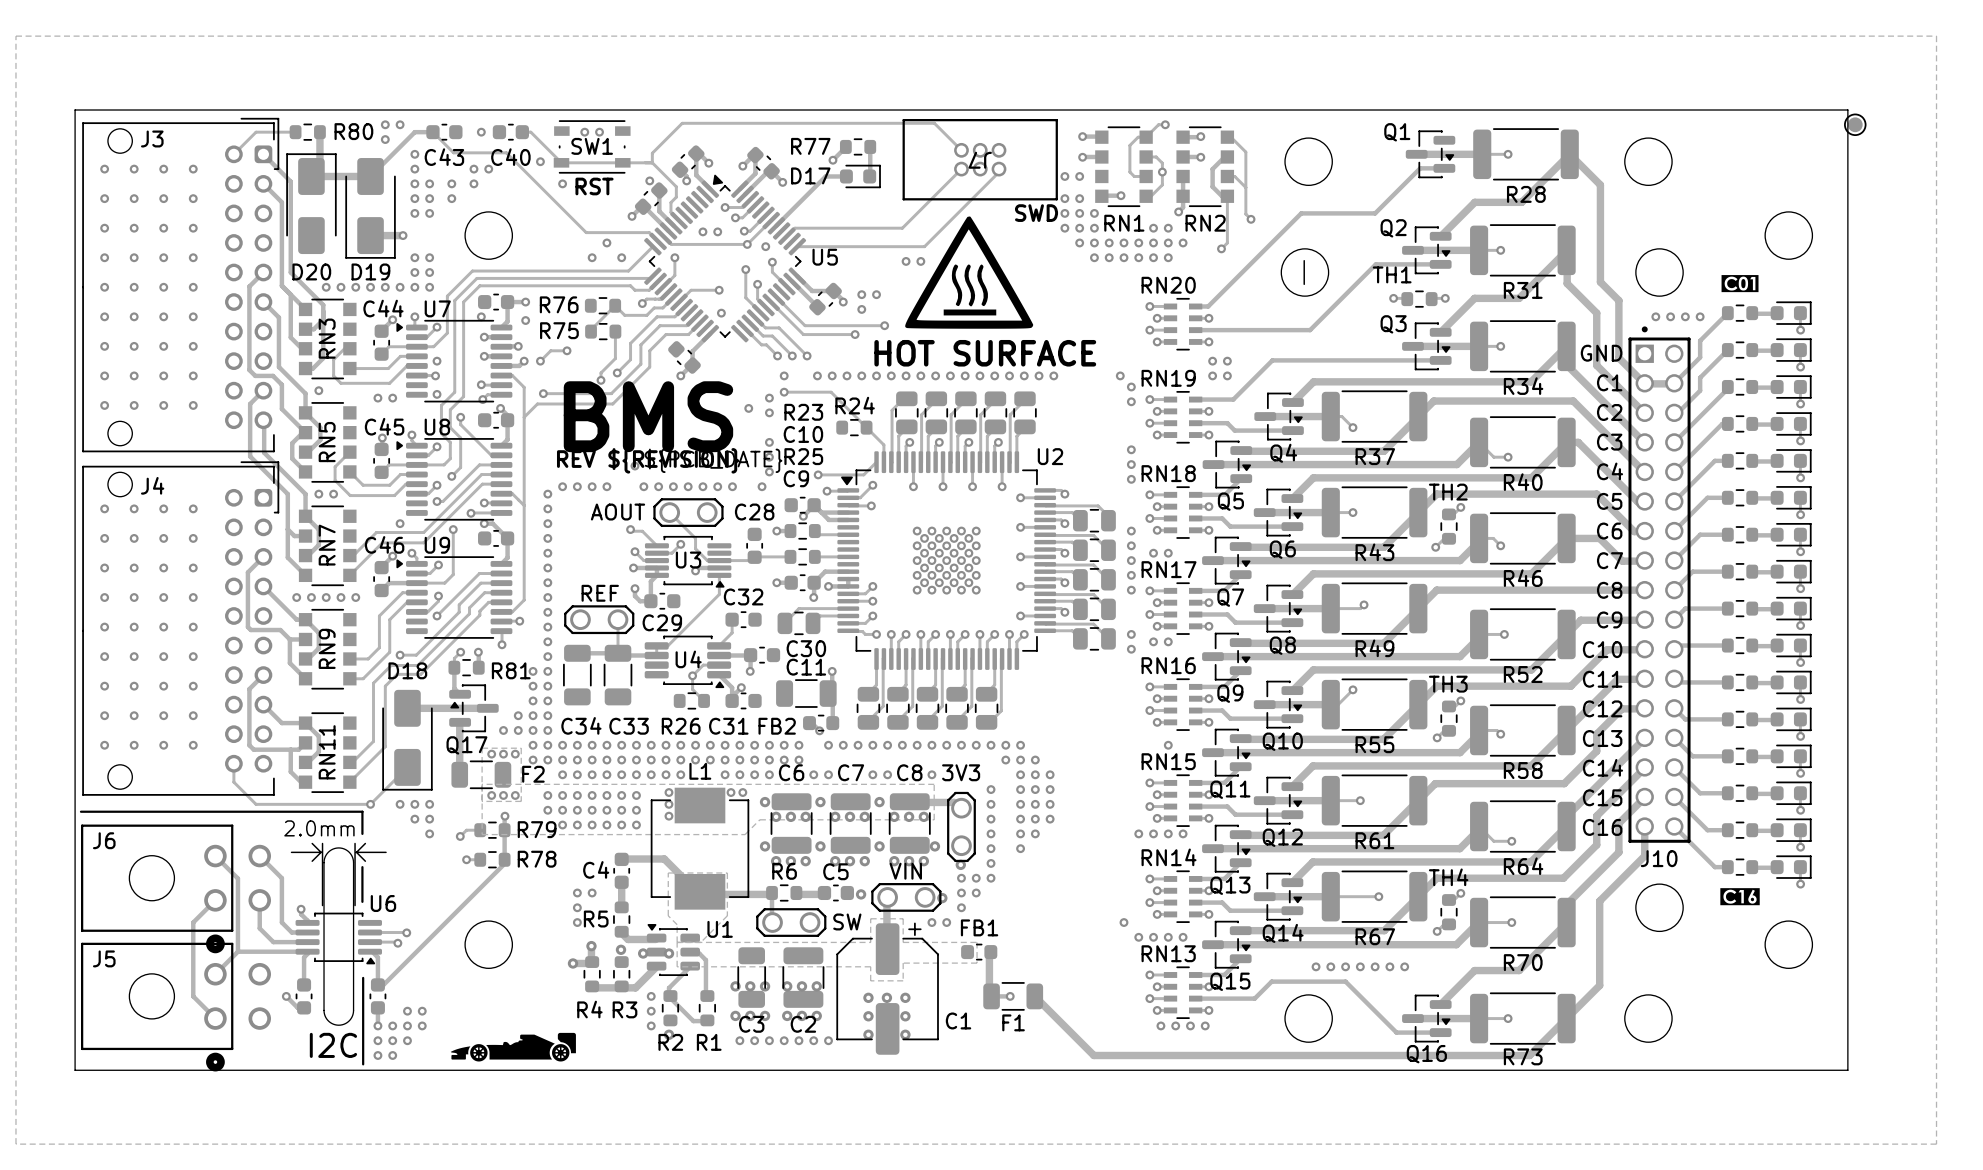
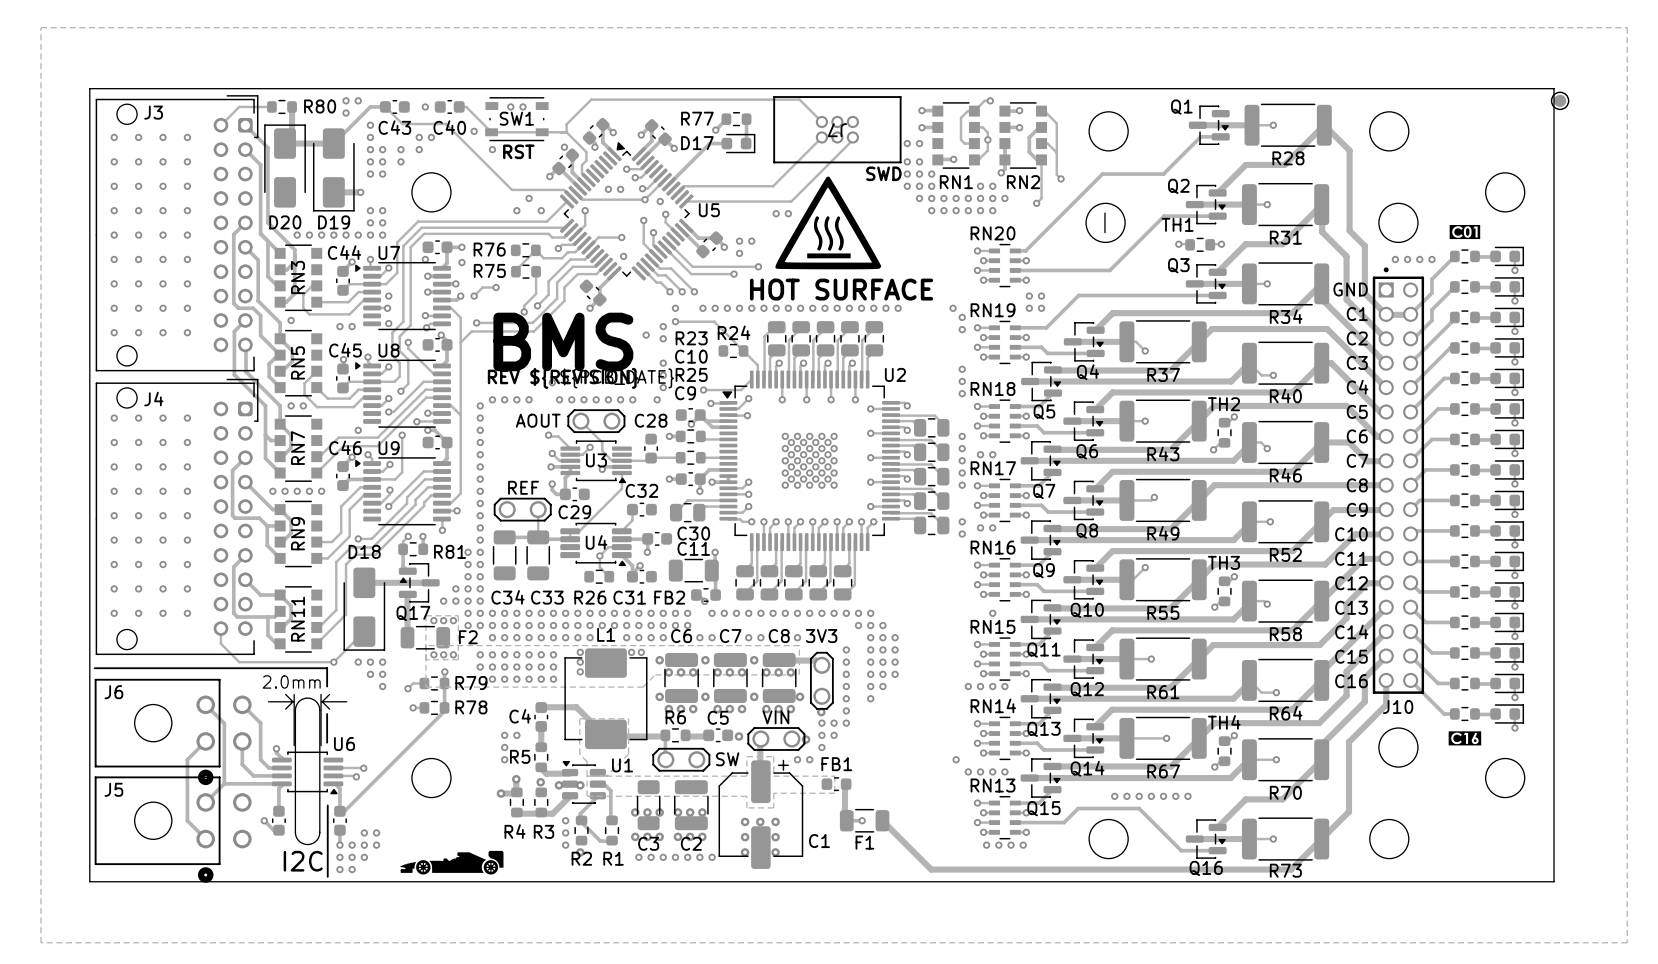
L1 footprint: [650, 787, 750, 910] -> [564, 648, 648, 750]

